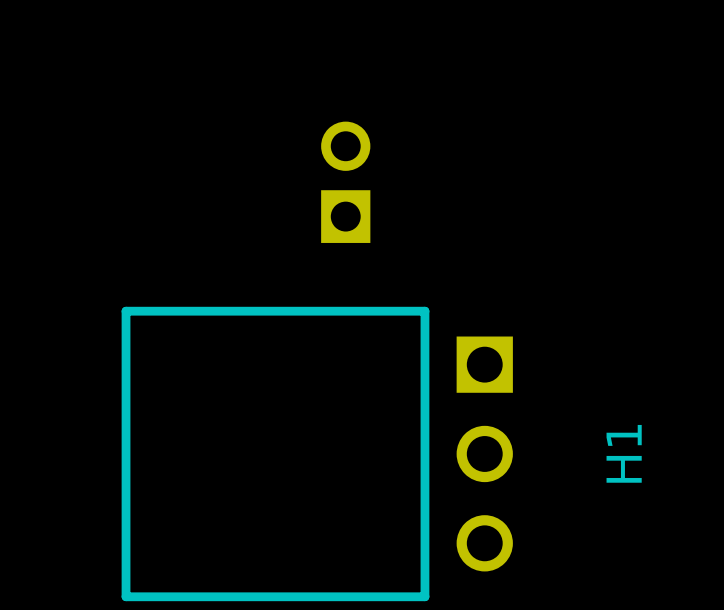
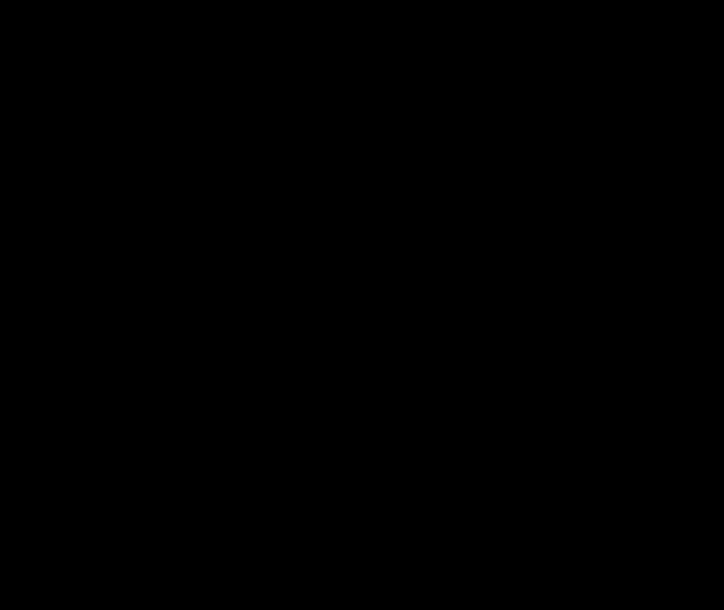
part: (345, 182) -> none
H1: (317, 453) -> none

